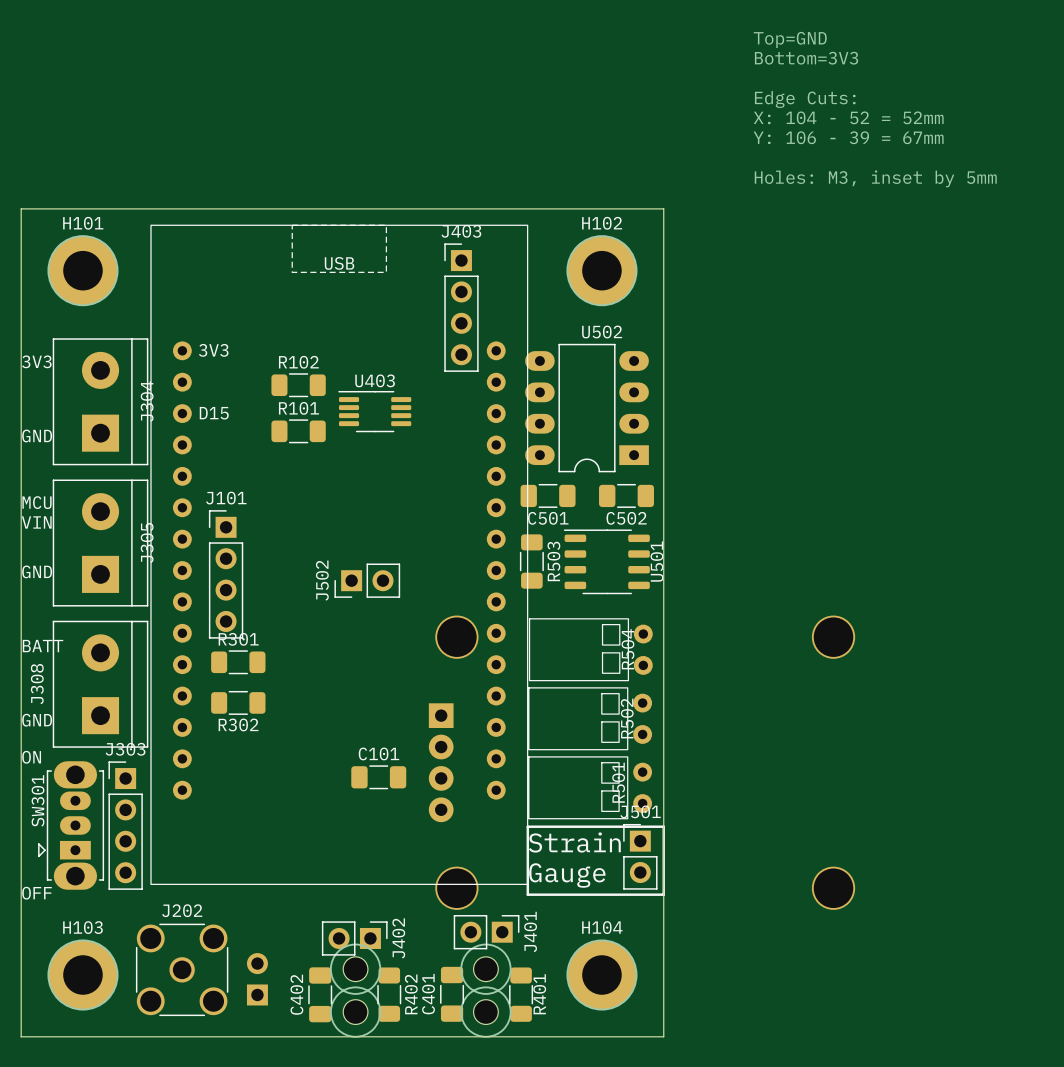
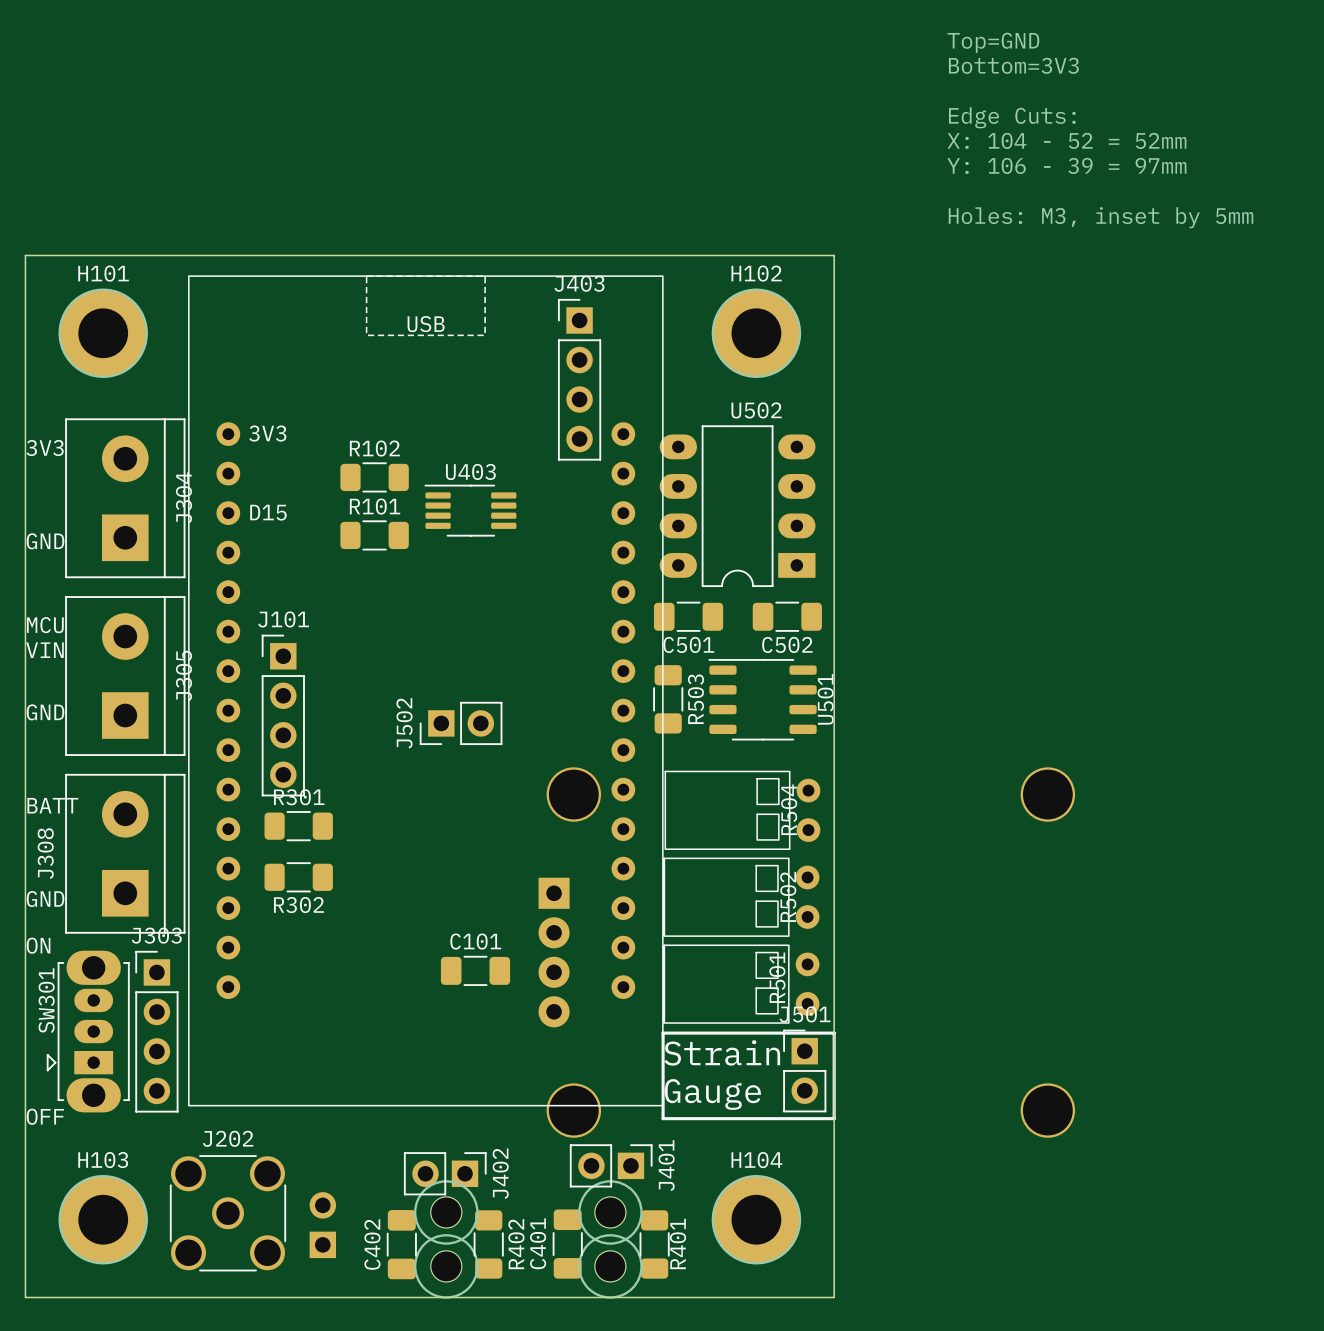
text: Y: 106 - 39 = 67mm (848, 137) -> Y: 106 - 39 = 97mm (1066, 165)

